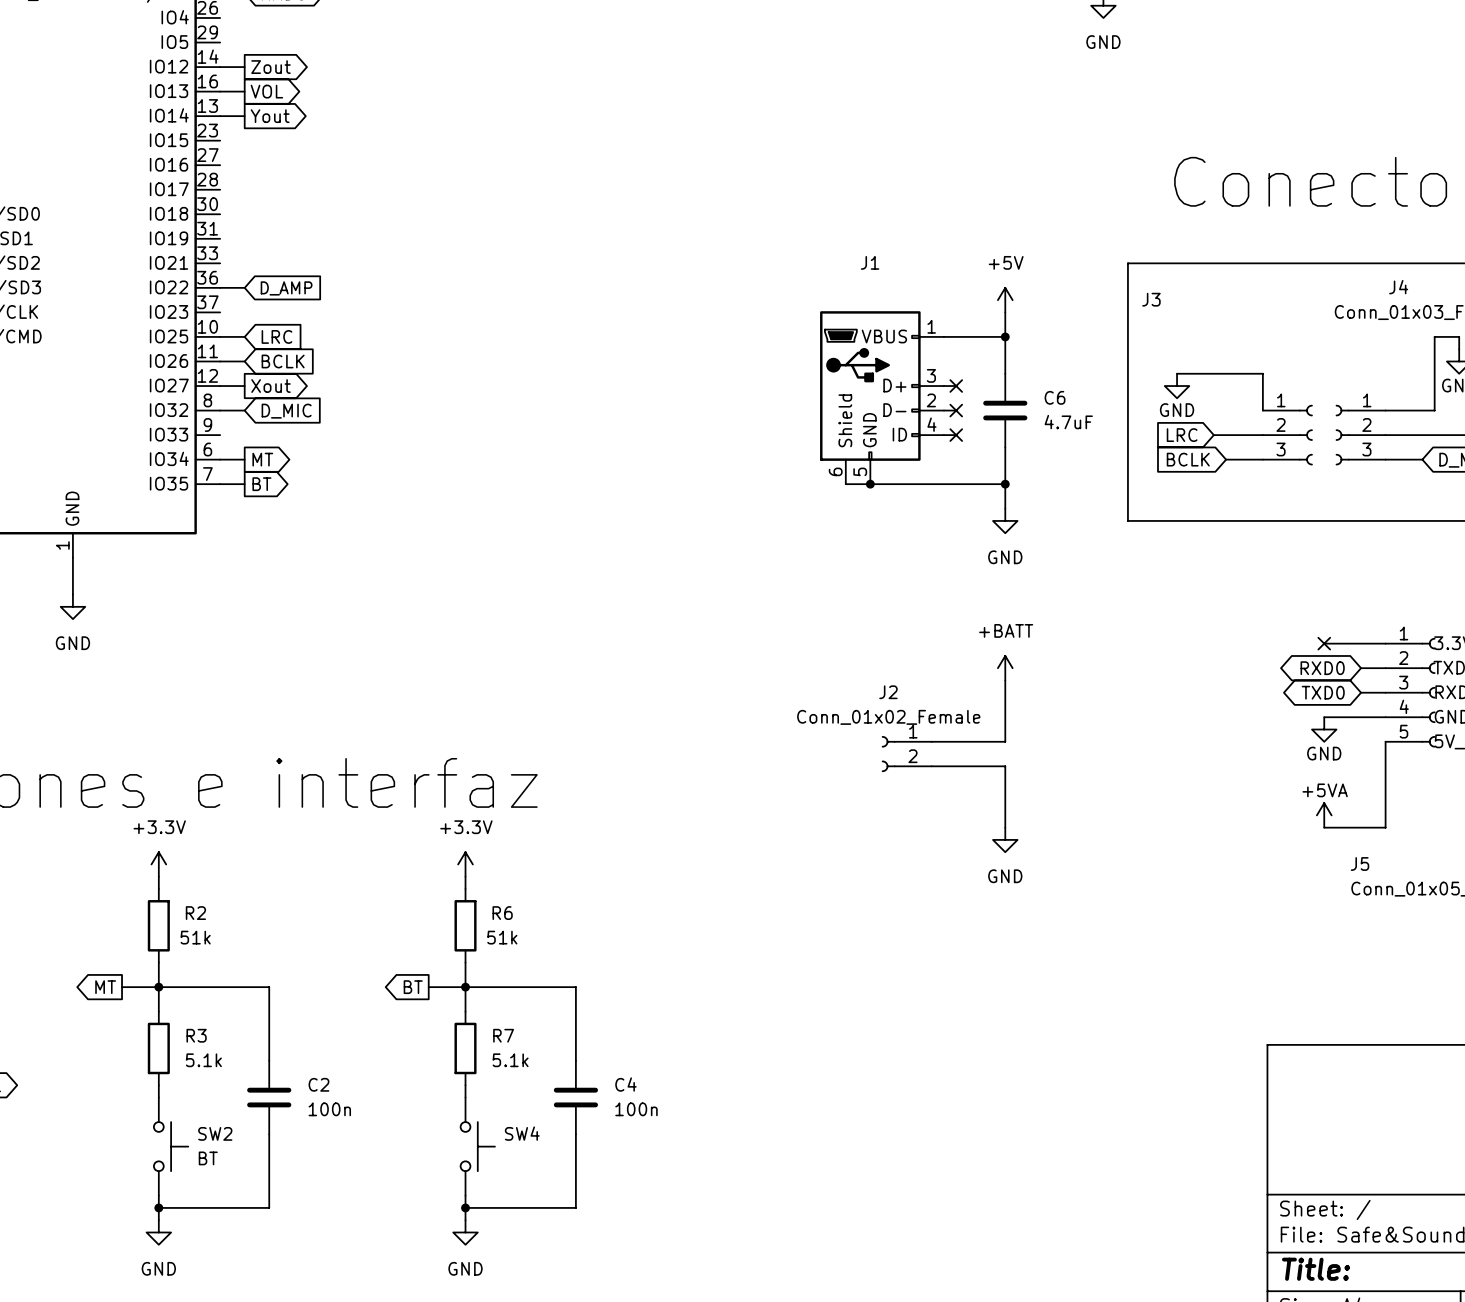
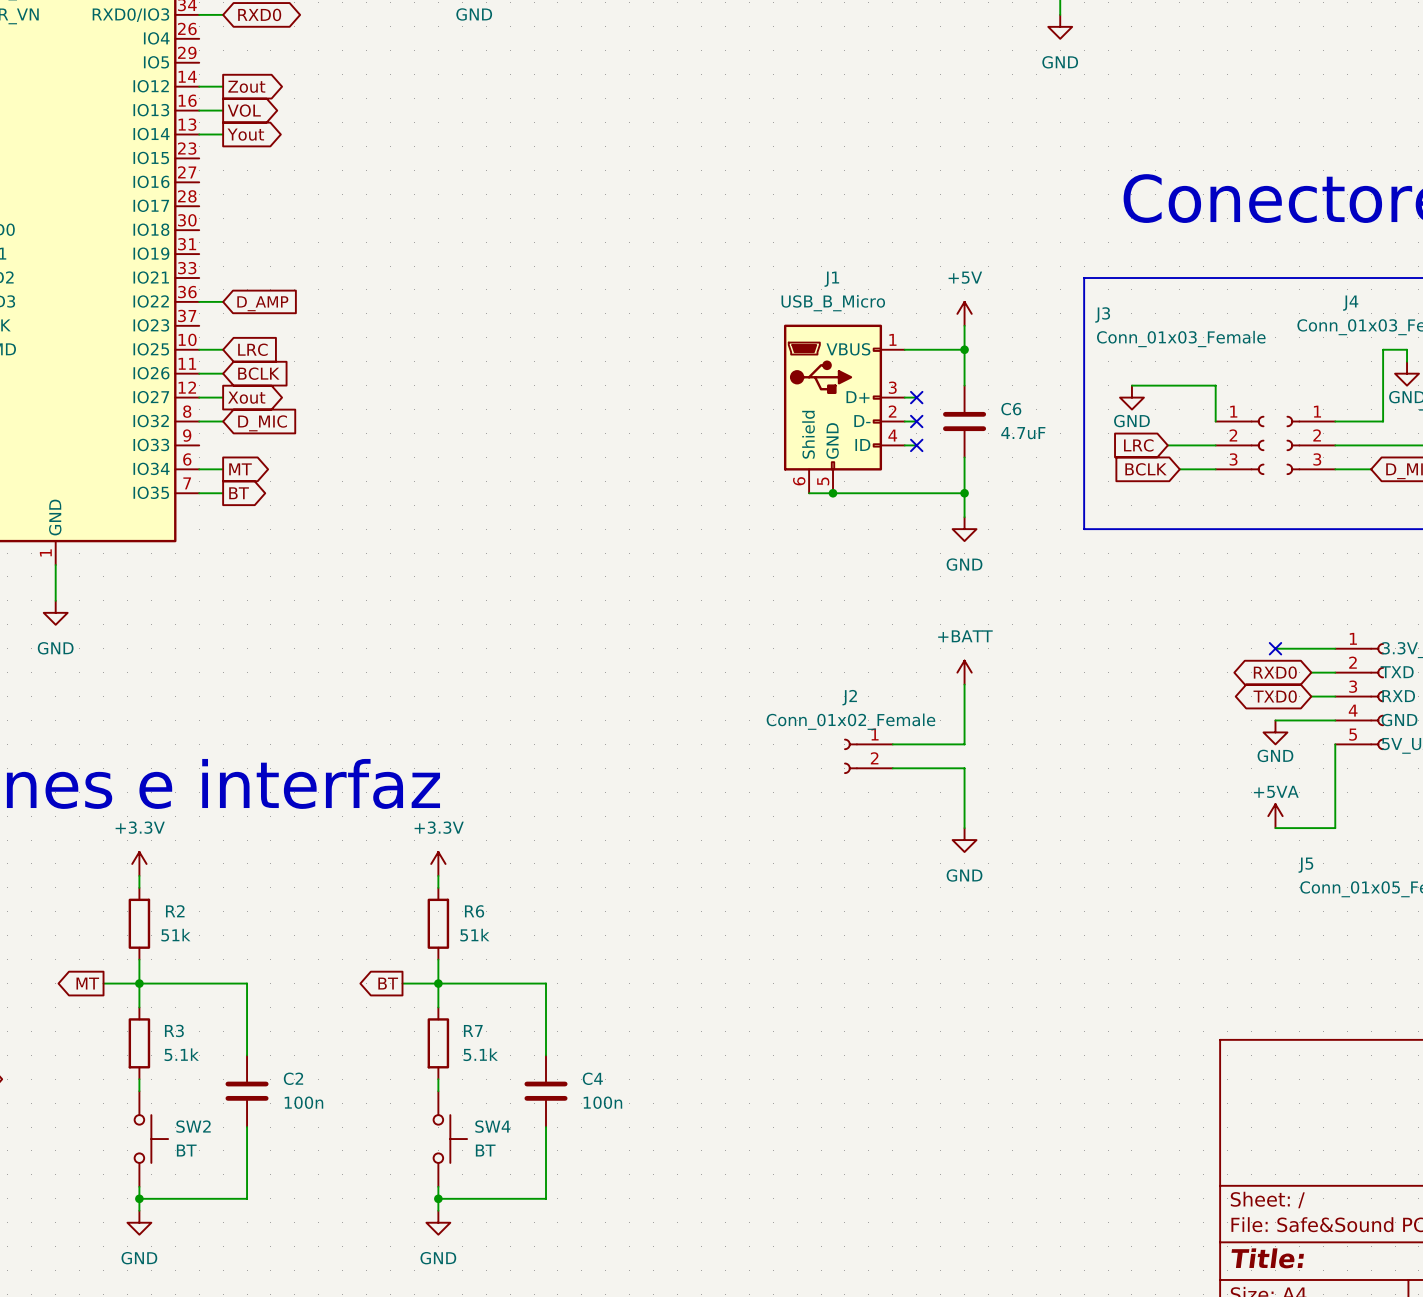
J1 value: none -> USB_B_Micro (833, 303)
J3 value: none -> Conn_01x03_Female (1181, 339)
SW4 value: none -> BT (485, 1150)

